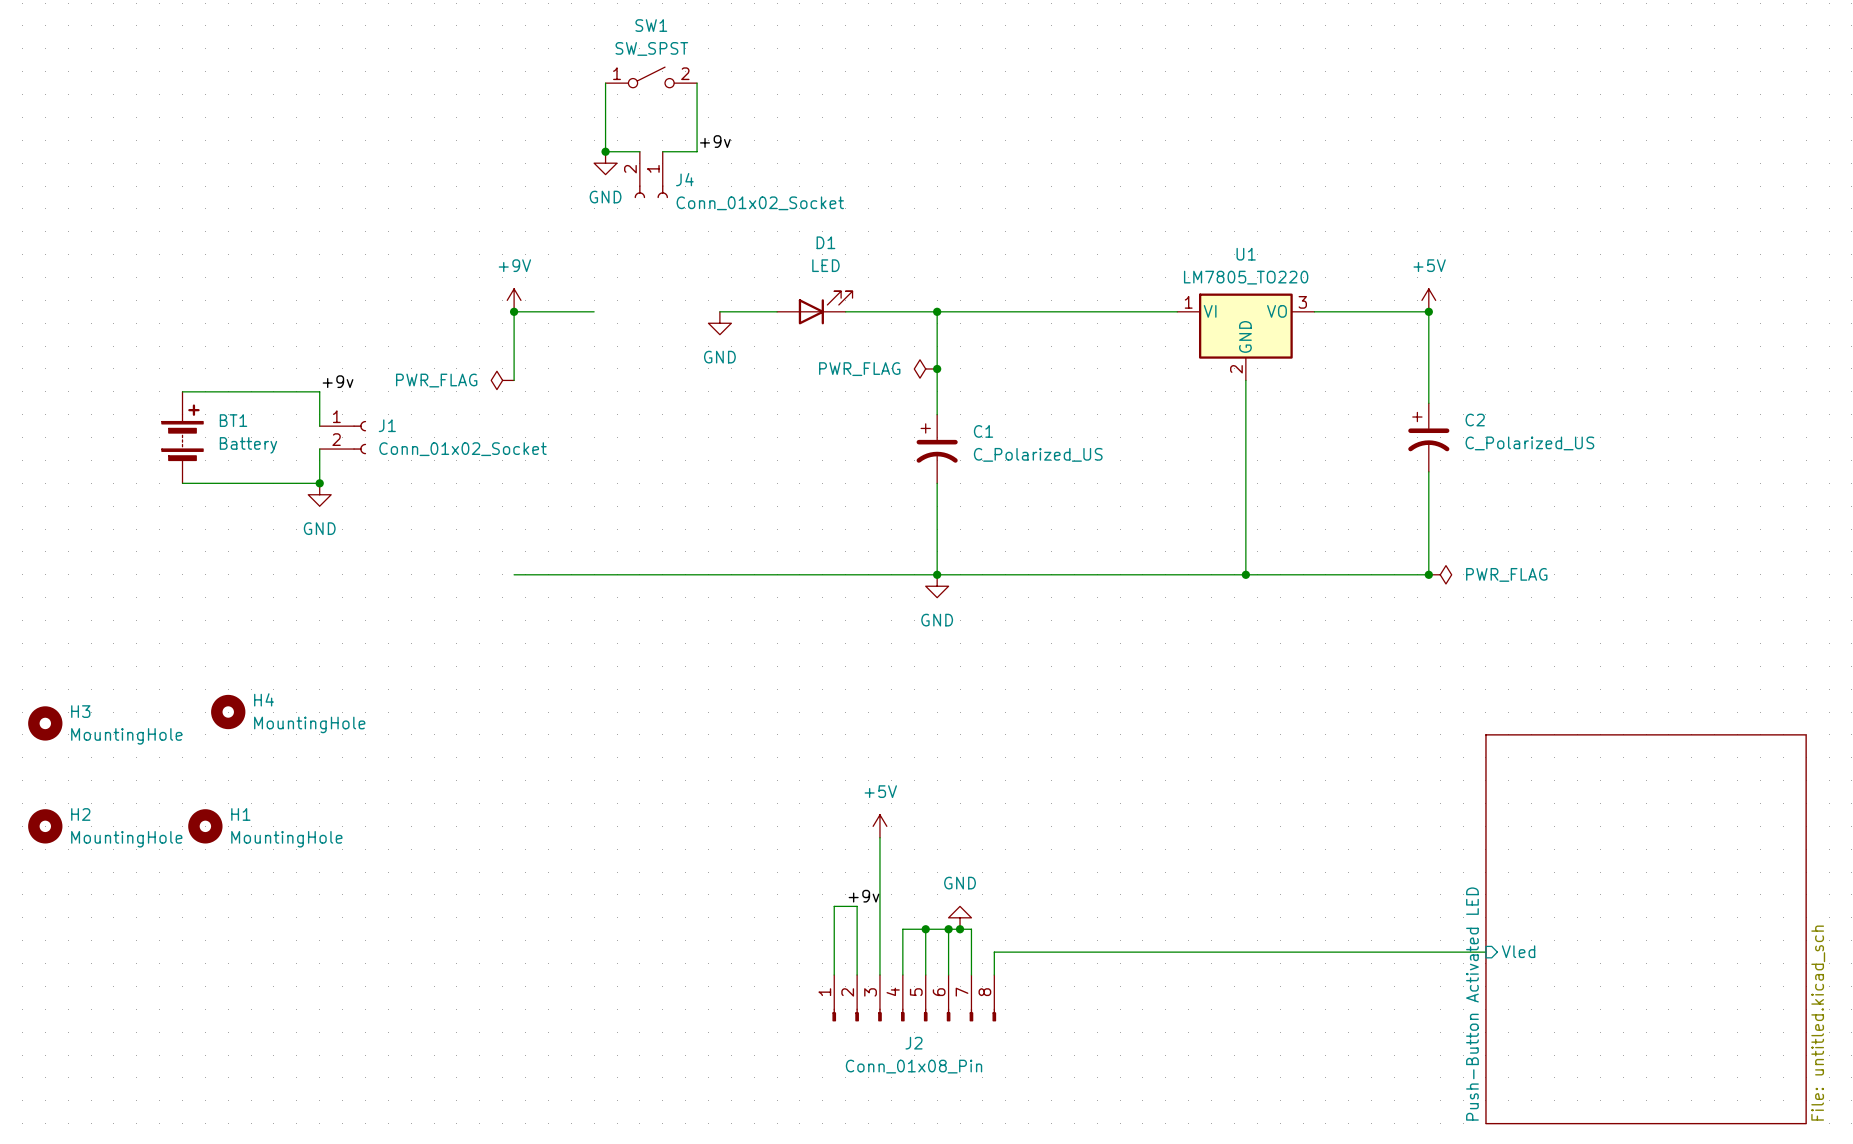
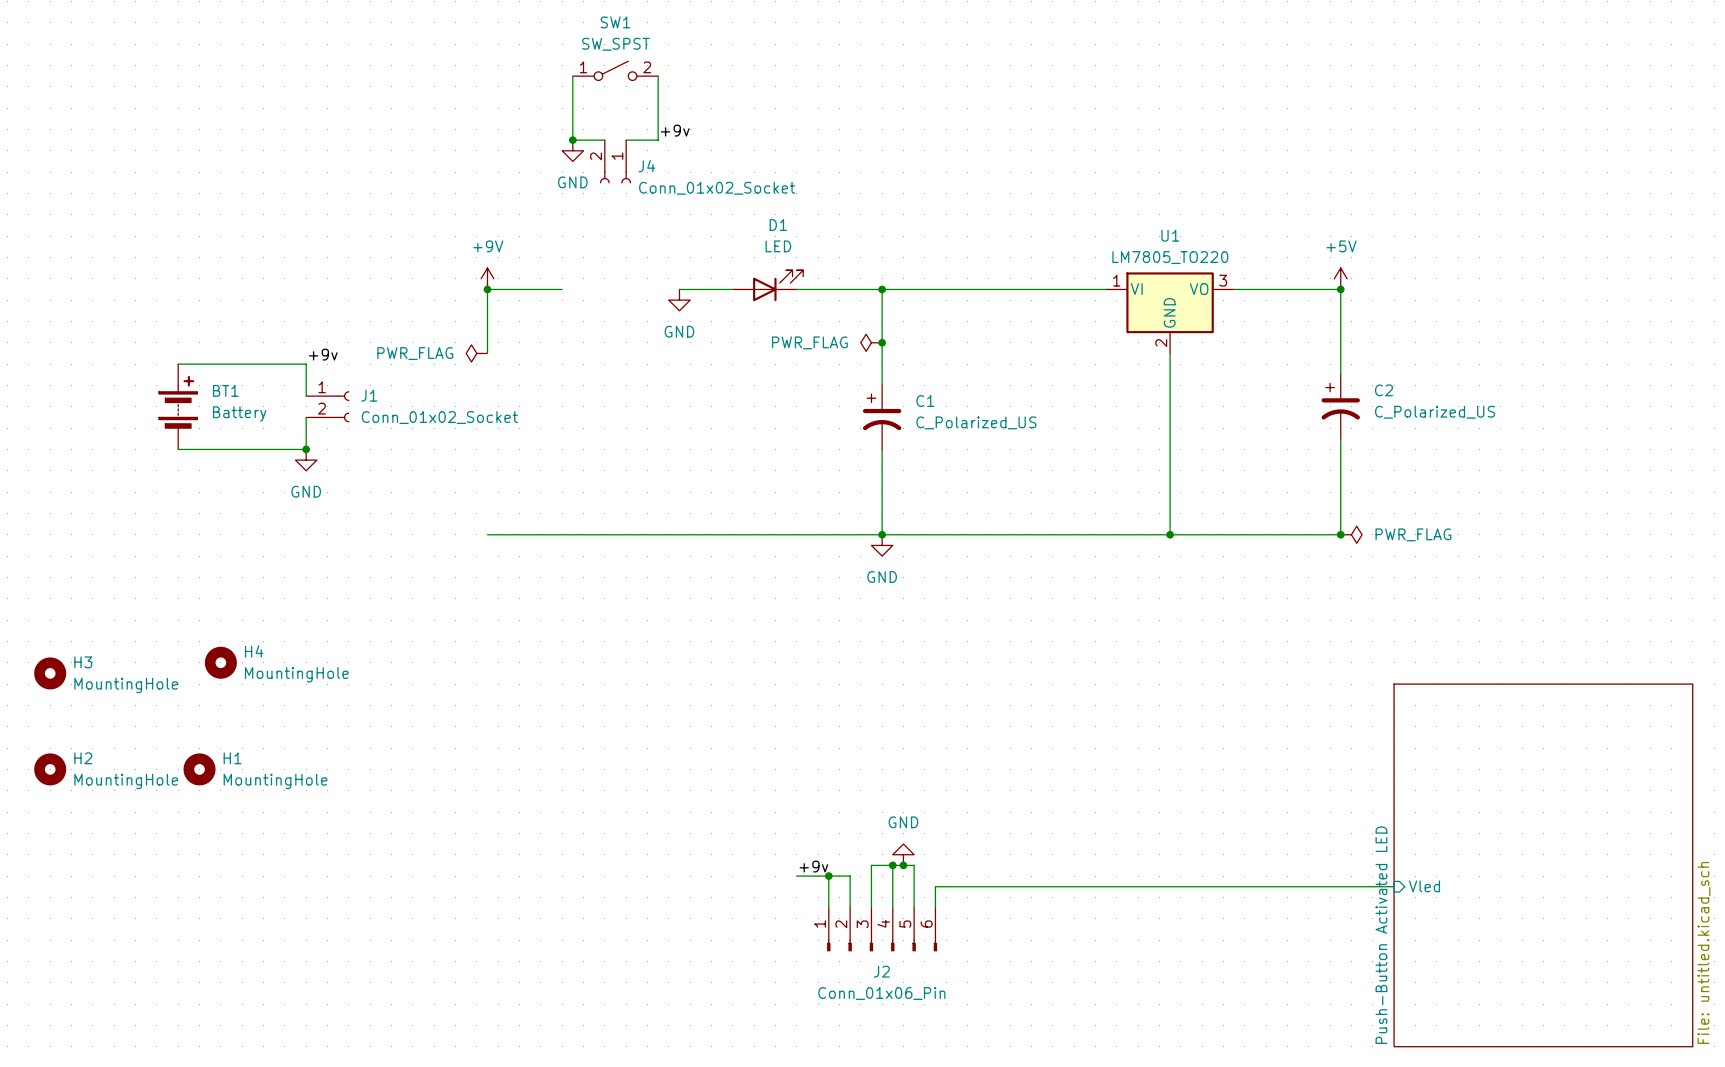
power symbol: +5V (879, 826) -> none
wire: (879, 837) (879, 940) -> none
label position: +9v (864, 896) -> +9v (813, 866)
wire: (925, 929) (902, 929) (902, 940) -> (796, 876) (850, 876)
junction position: (925, 929) -> (828, 876)
J2 symbol: [832, 974, 997, 1022] -> [827, 908, 938, 952]
wire: (834, 974) (834, 906) (857, 906) (857, 974) -> none
J2 value: Conn_01x08_Pin (914, 1066) -> Conn_01x06_Pin (881, 993)

